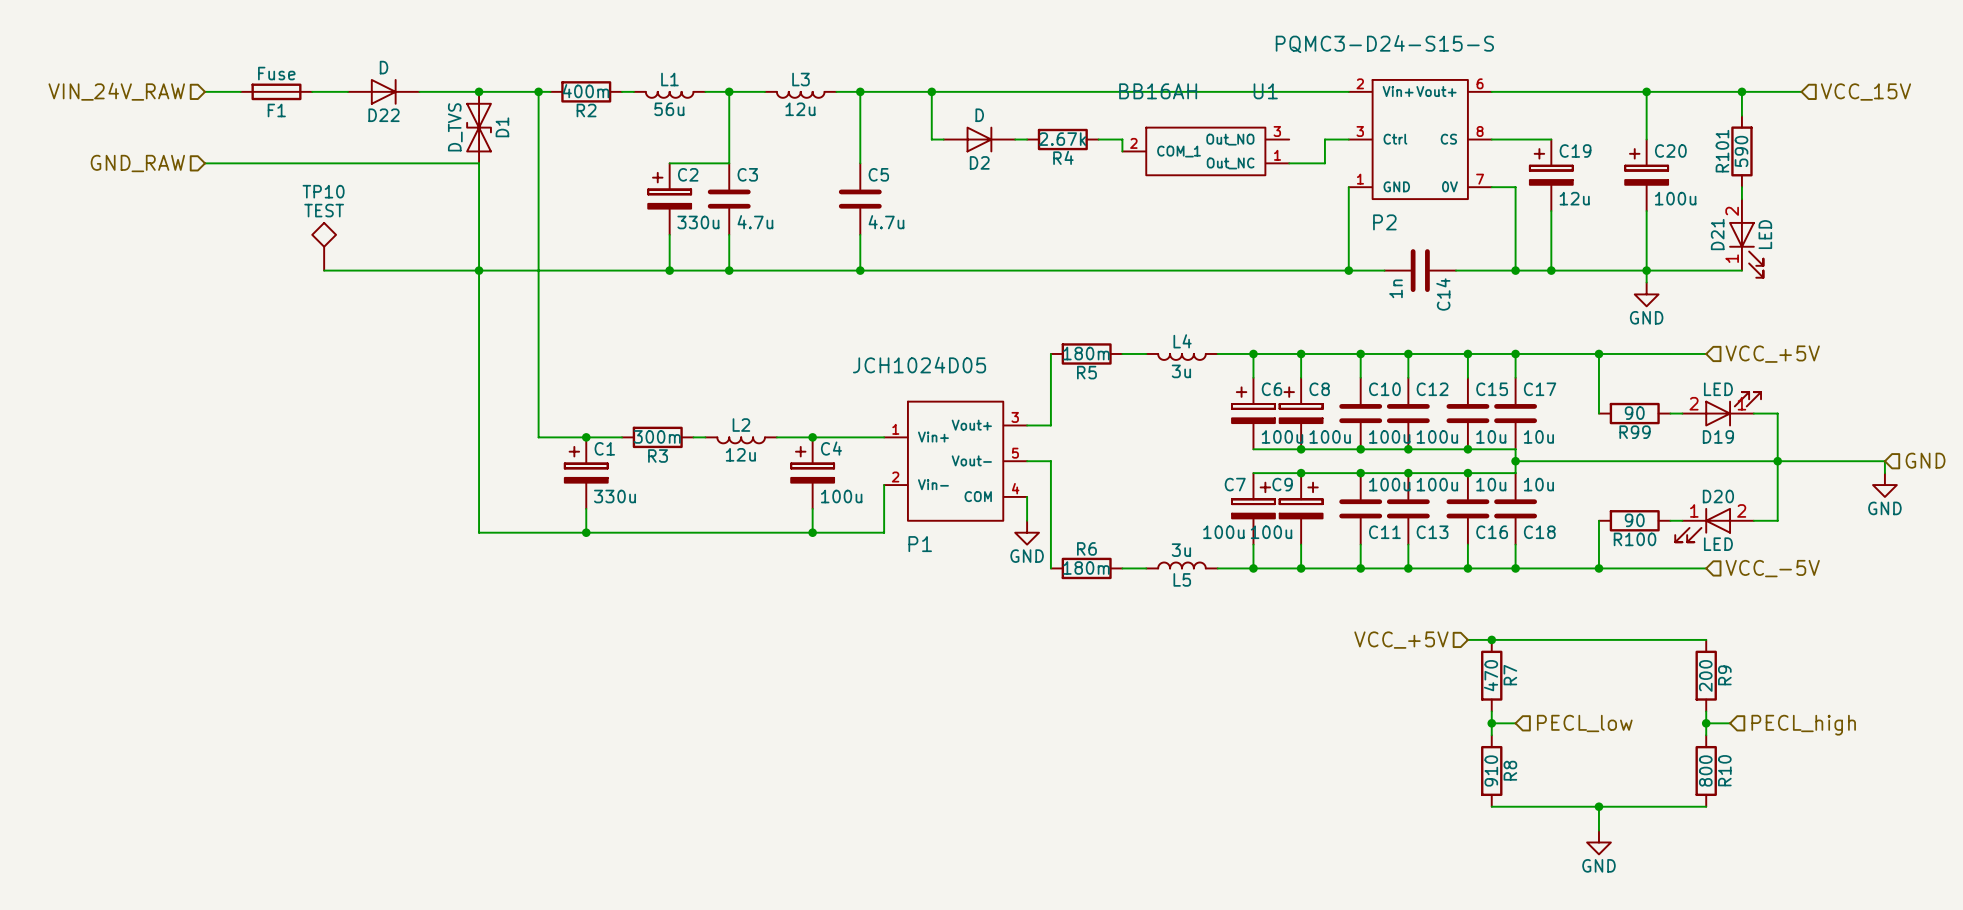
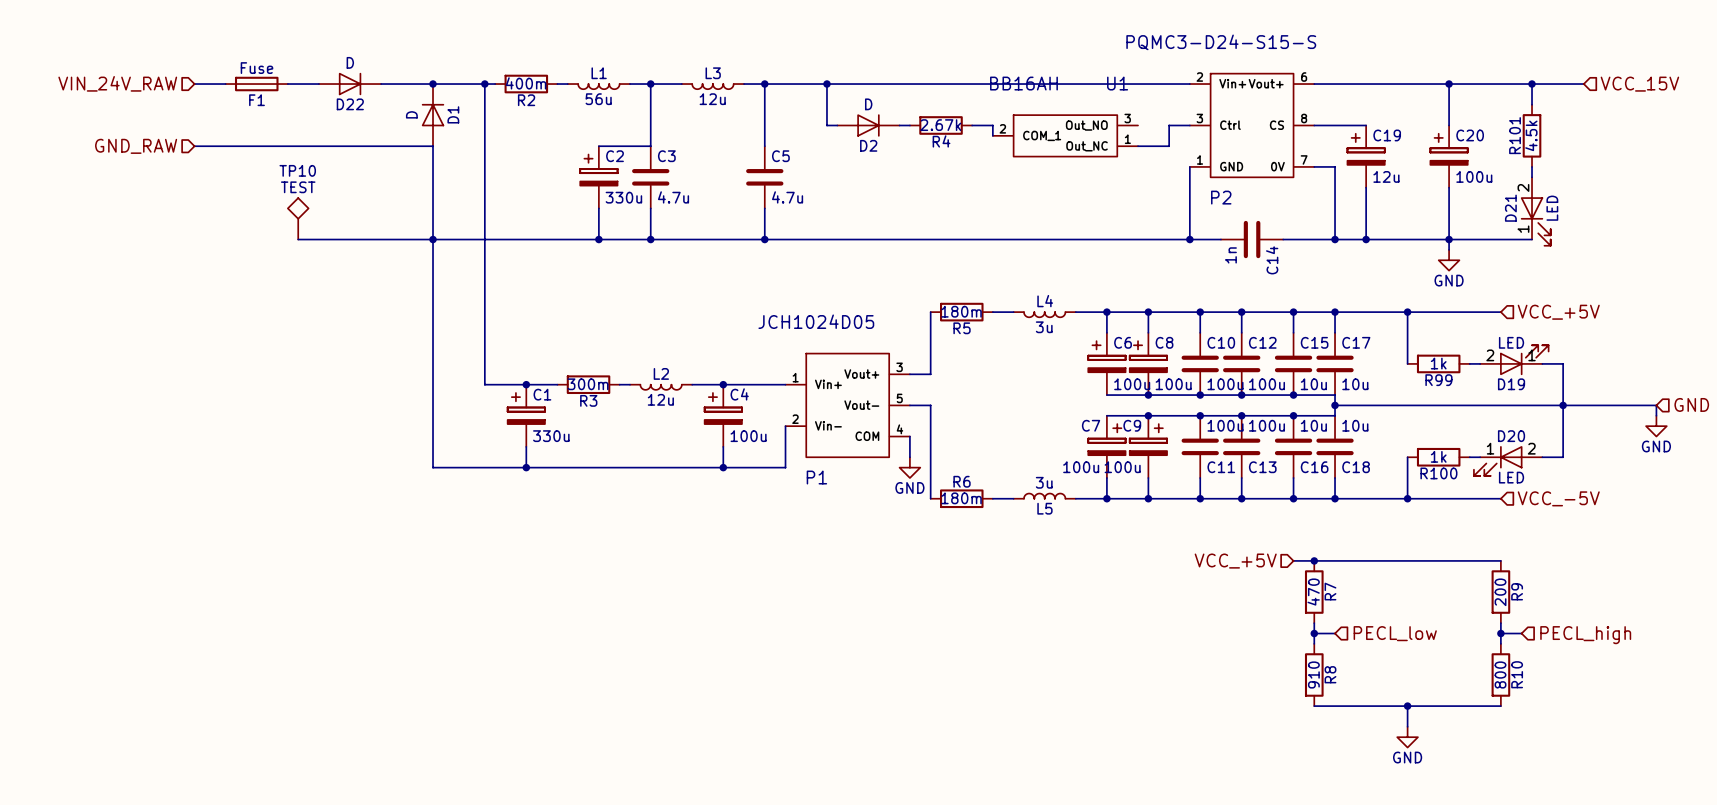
D1 symbol: [466, 91, 492, 164] -> [421, 84, 445, 147]
D1 value: D_TVS (455, 127) -> D (411, 114)
R101 value: 590 (1741, 151) -> 4.5k (1531, 135)
R99 value: 90 (1634, 413) -> 1k (1438, 363)
R100 value: 90 (1634, 520) -> 1k (1438, 456)

